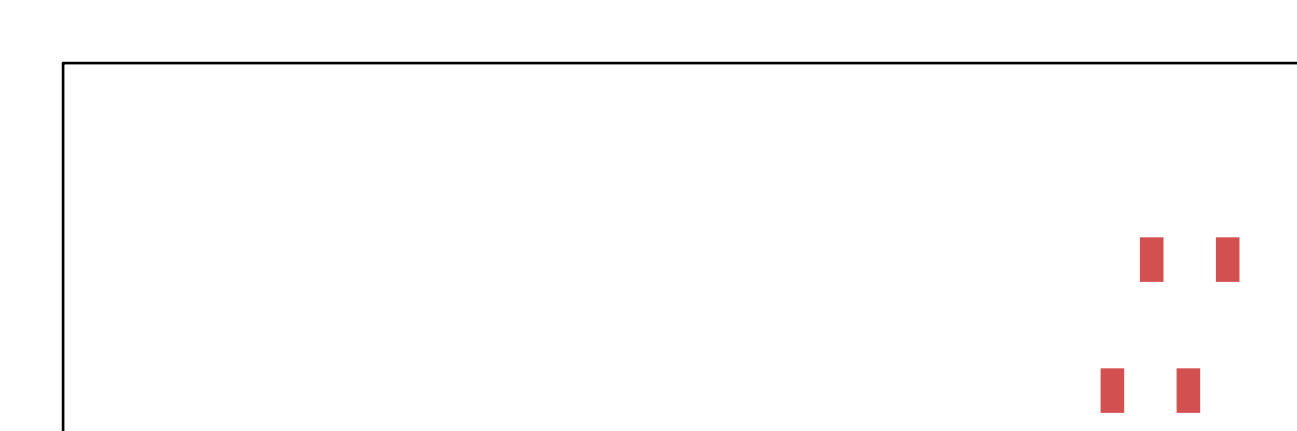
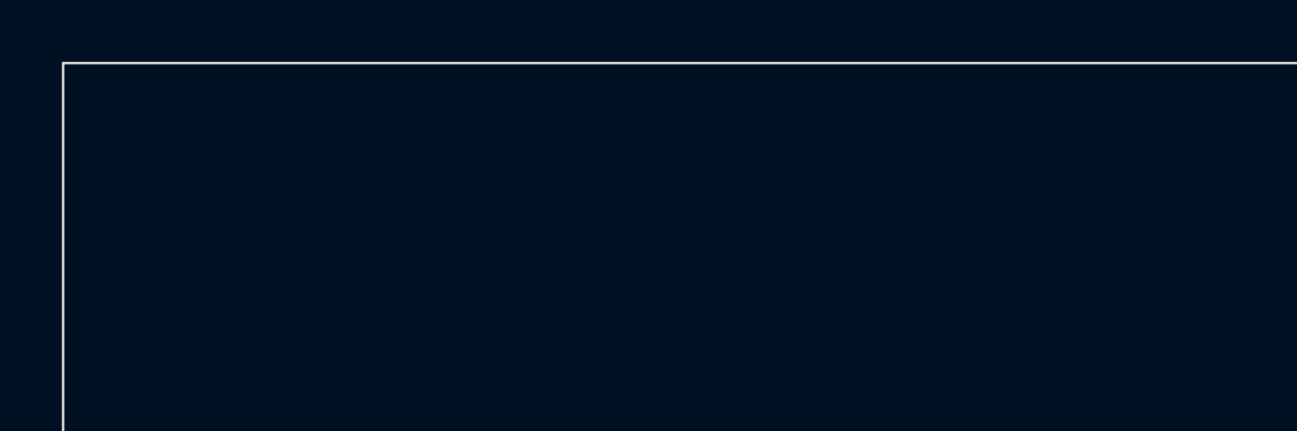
part: (1189, 259) -> none
part: (1150, 390) -> none

